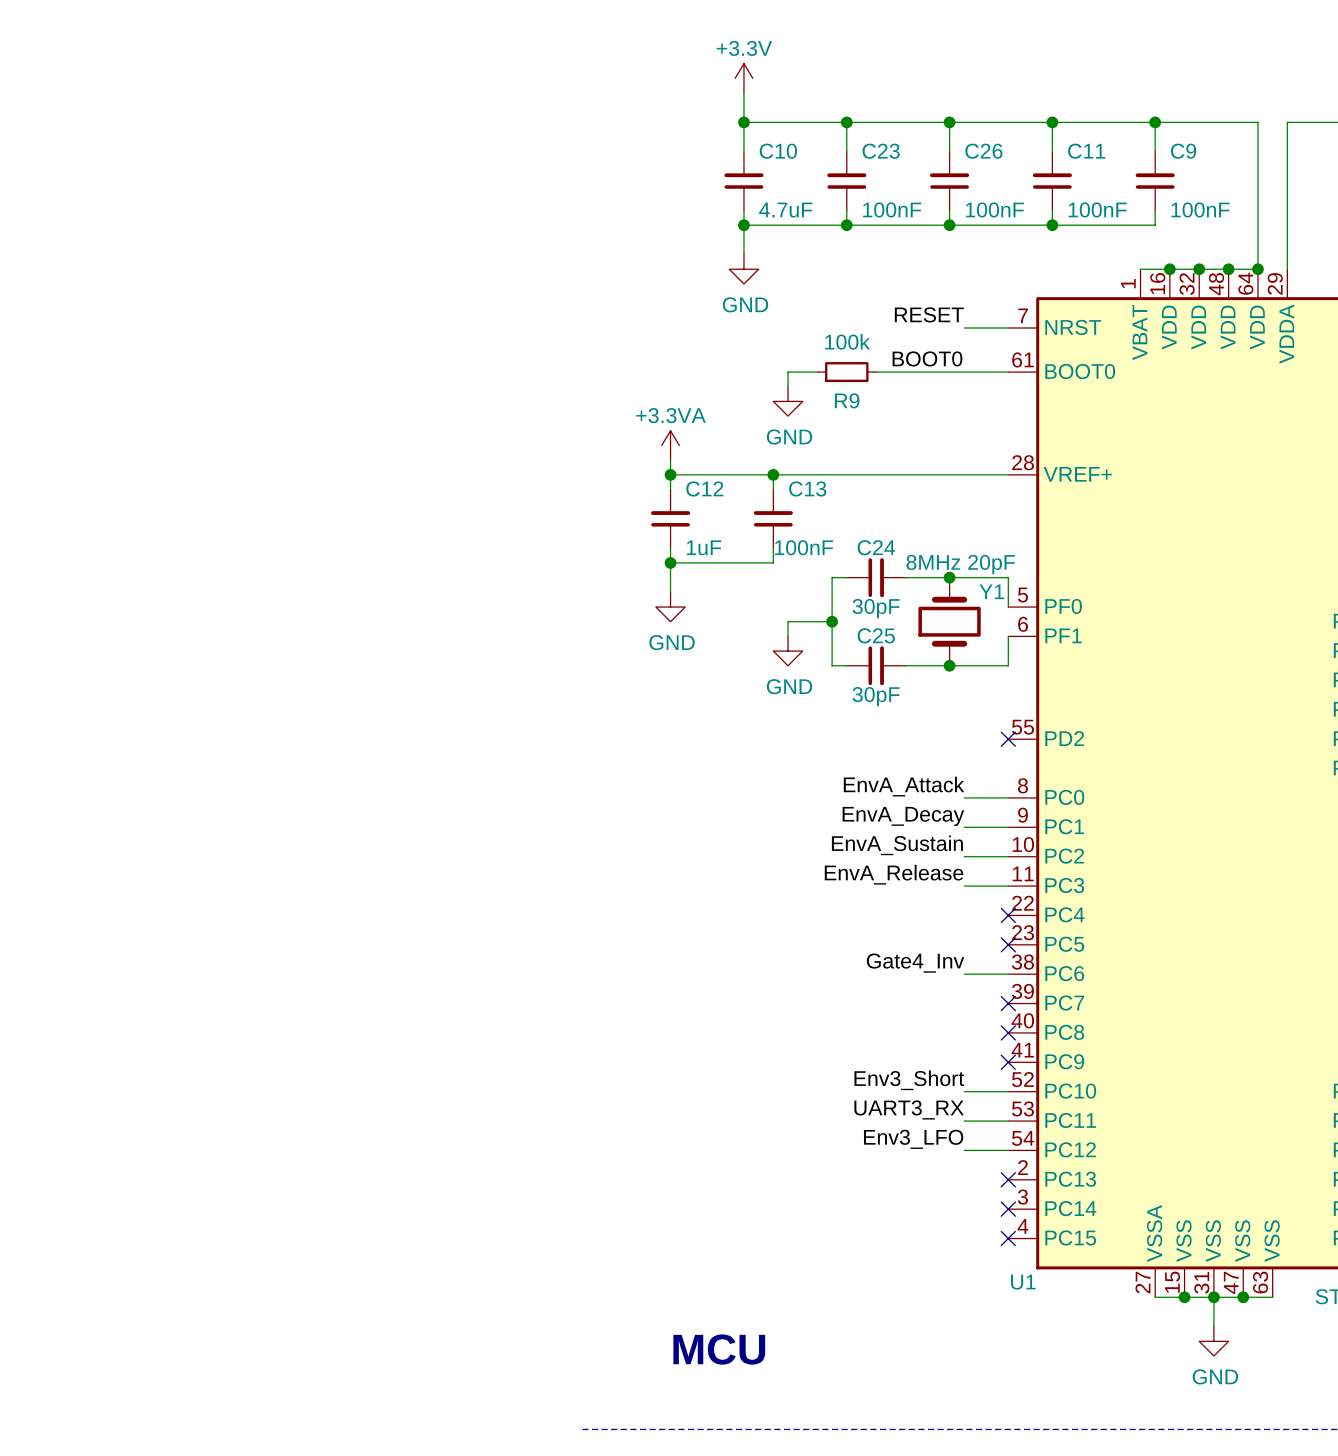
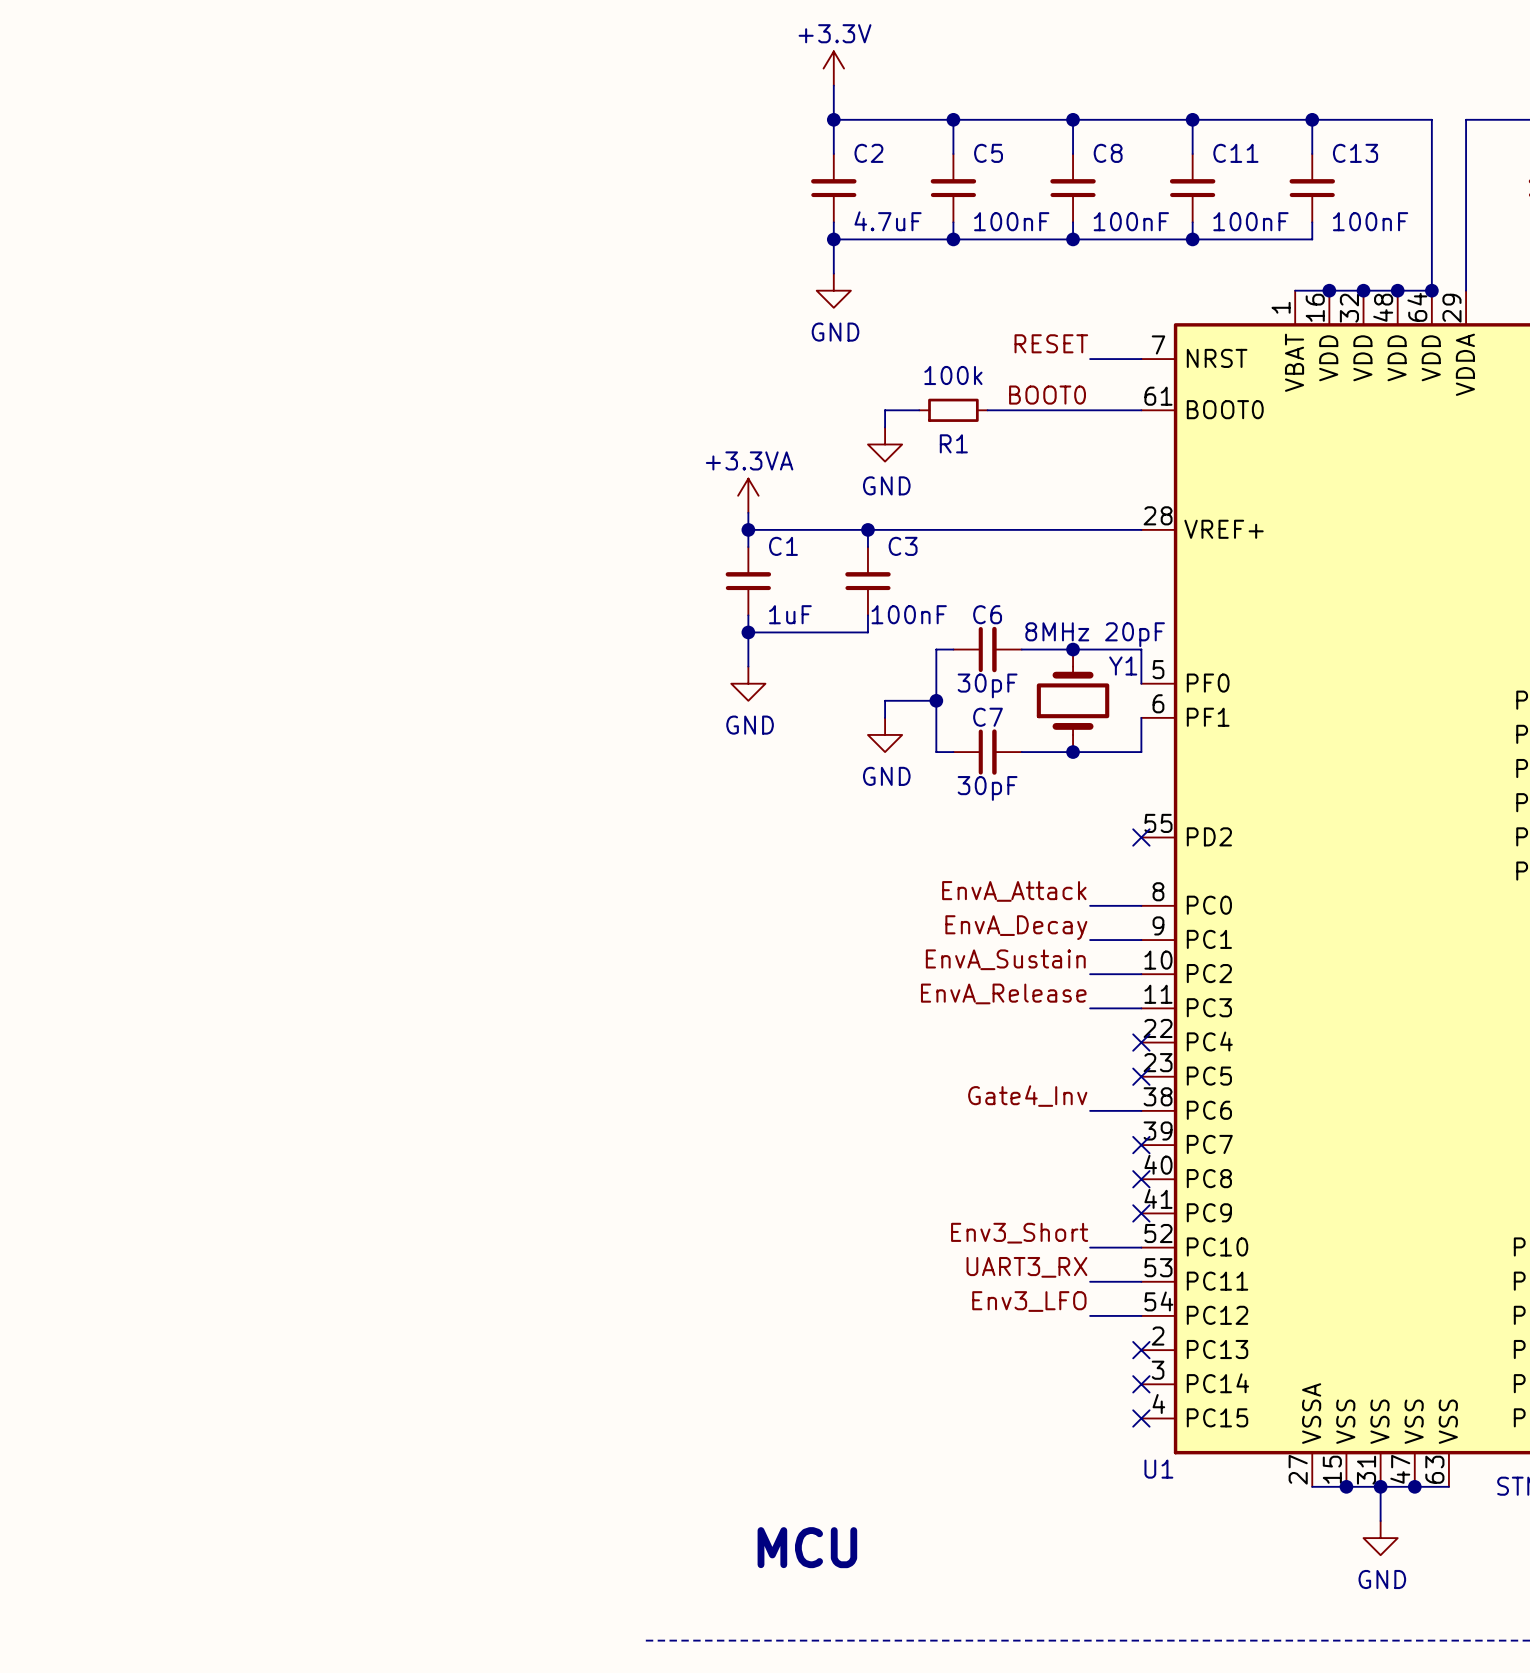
C10 name: C10 (778, 151) -> C2 (868, 153)
C23 name: C23 (881, 151) -> C5 (988, 153)
C26 name: C26 (983, 151) -> C8 (1108, 153)
C9 name: C9 (1183, 151) -> C13 (1355, 153)
R9 name: R9 (847, 400) -> R1 (953, 443)
C12 name: C12 (704, 488) -> C1 (783, 546)
C13 name: C13 (807, 488) -> C3 (903, 546)
C24 name: C24 (876, 547) -> C6 (987, 614)
C25 name: C25 (876, 635) -> C7 (988, 717)

